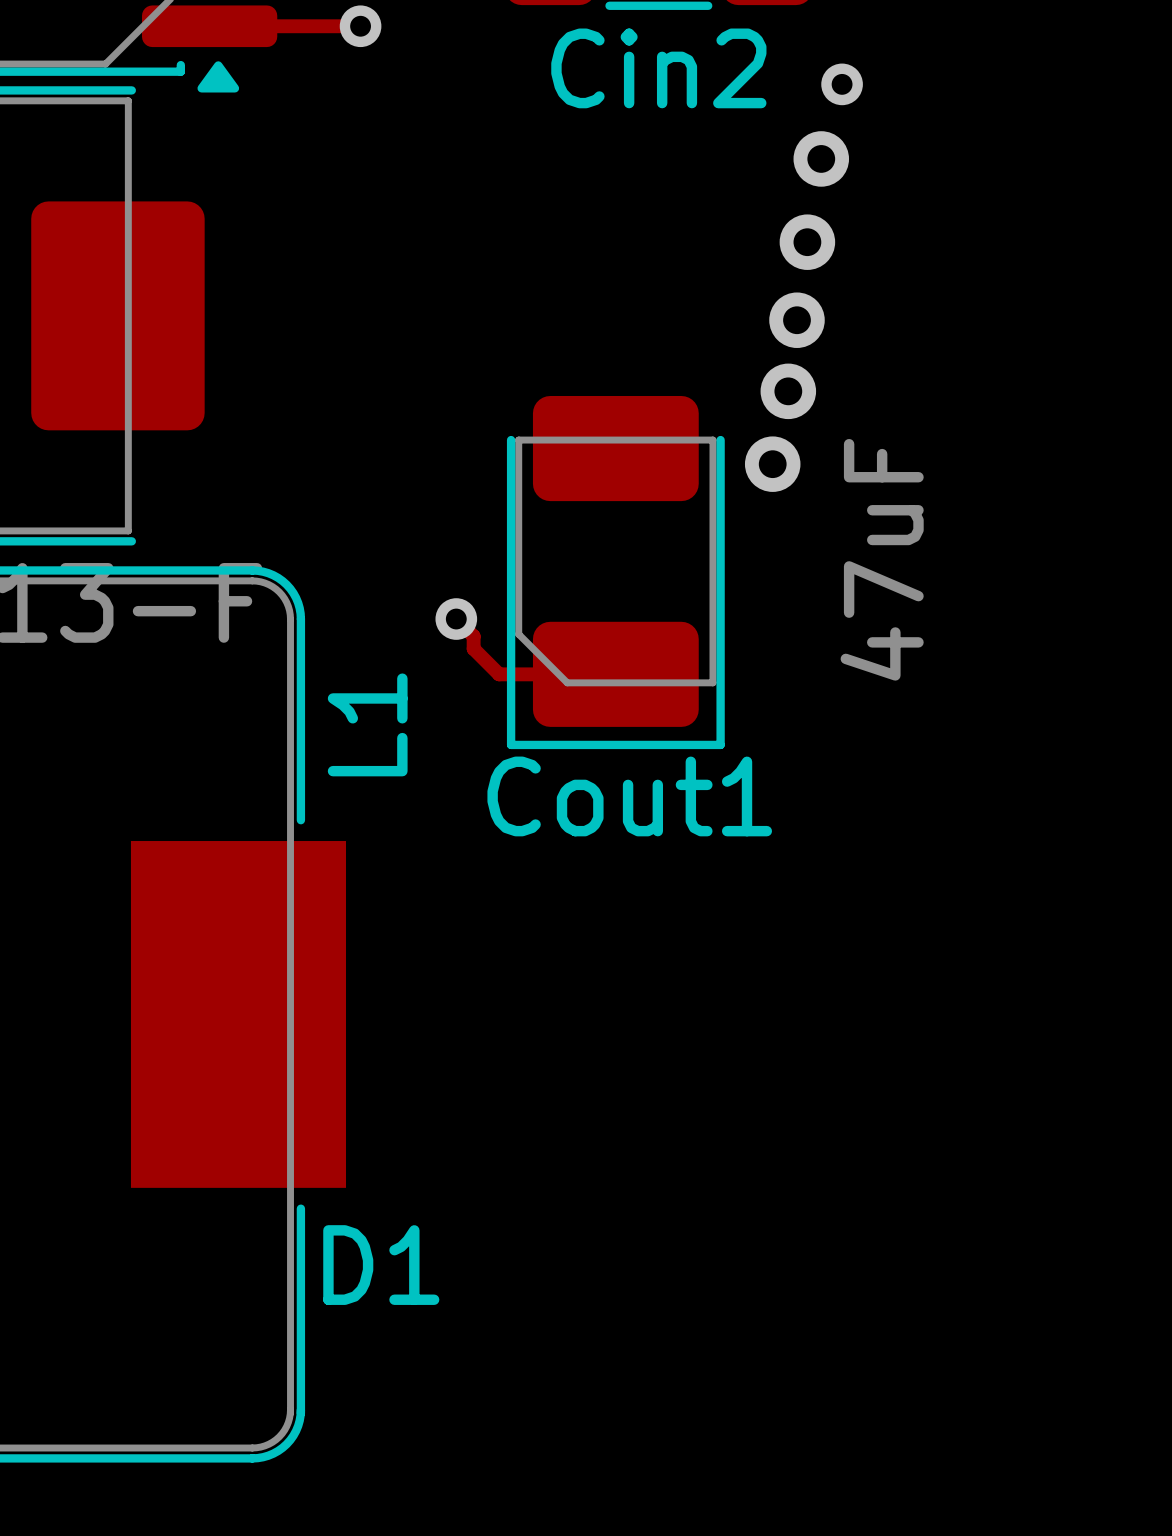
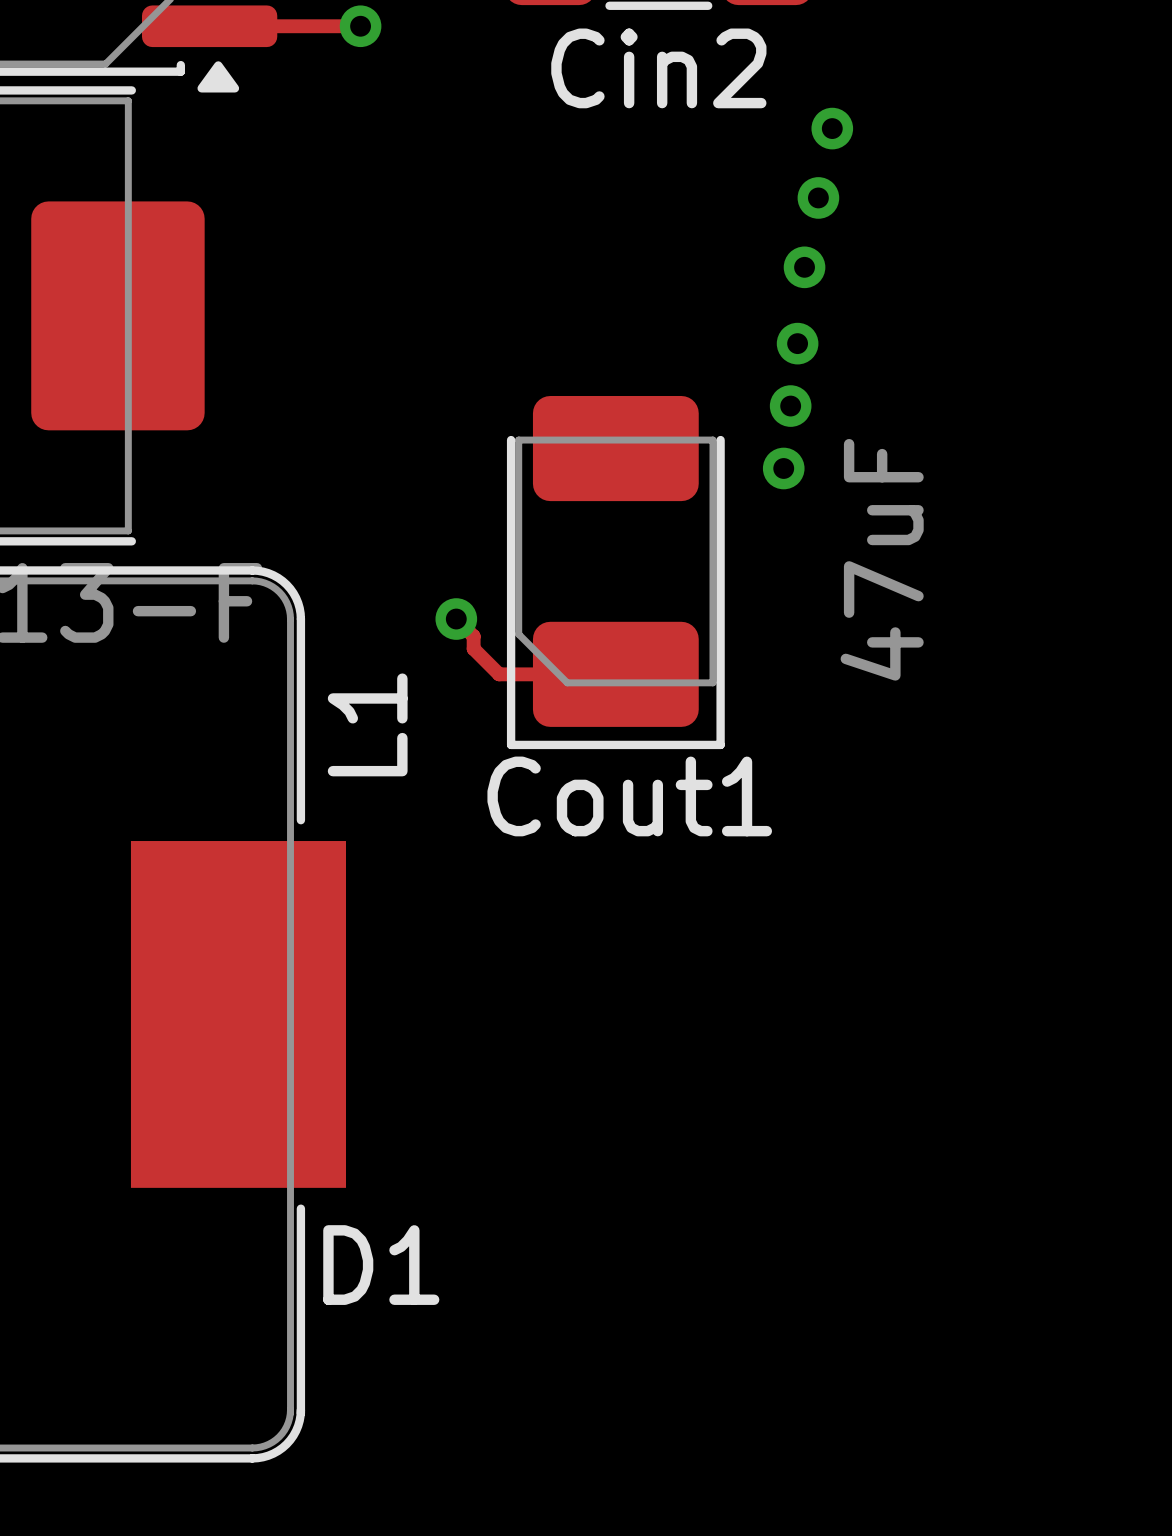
via position: (842, 84) -> (832, 128)
via: (821, 158) -> none
via: none -> (818, 197)
via: (807, 242) -> none
via: none -> (804, 267)
via size: [769, 292, 825, 348] -> [776, 322, 819, 365]
via size: [760, 363, 817, 420] -> [769, 385, 812, 427]
via size: [744, 436, 801, 492] -> [762, 447, 805, 490]

